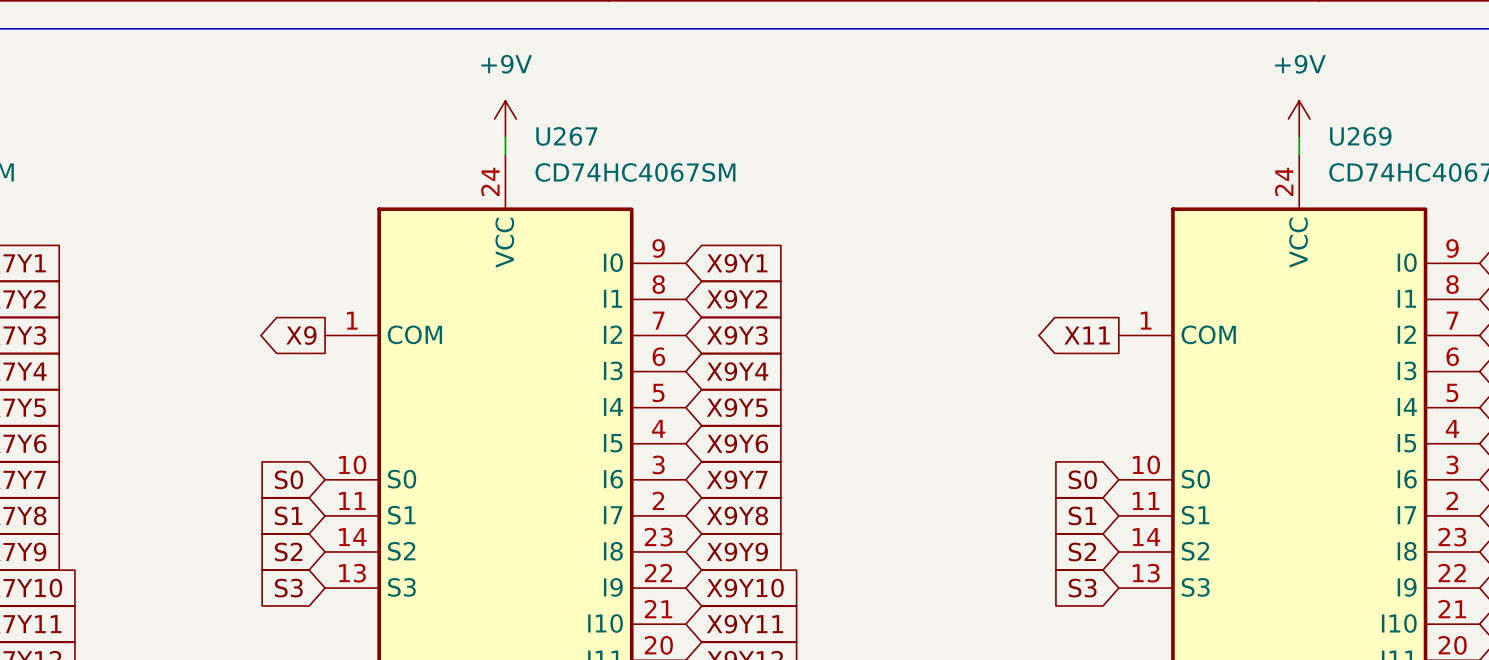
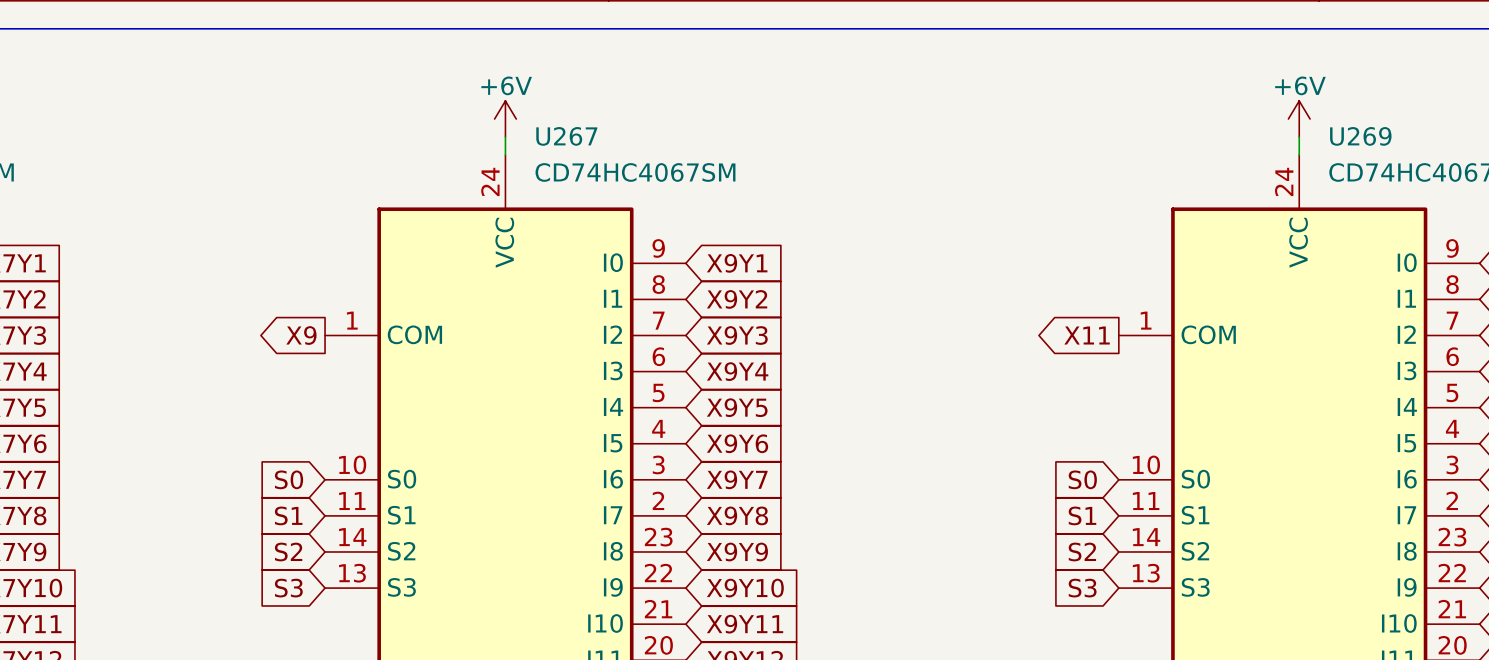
power symbol: +9V (505, 119) -> +6V (505, 119)
power symbol: +9V (1299, 119) -> +6V (1299, 119)

